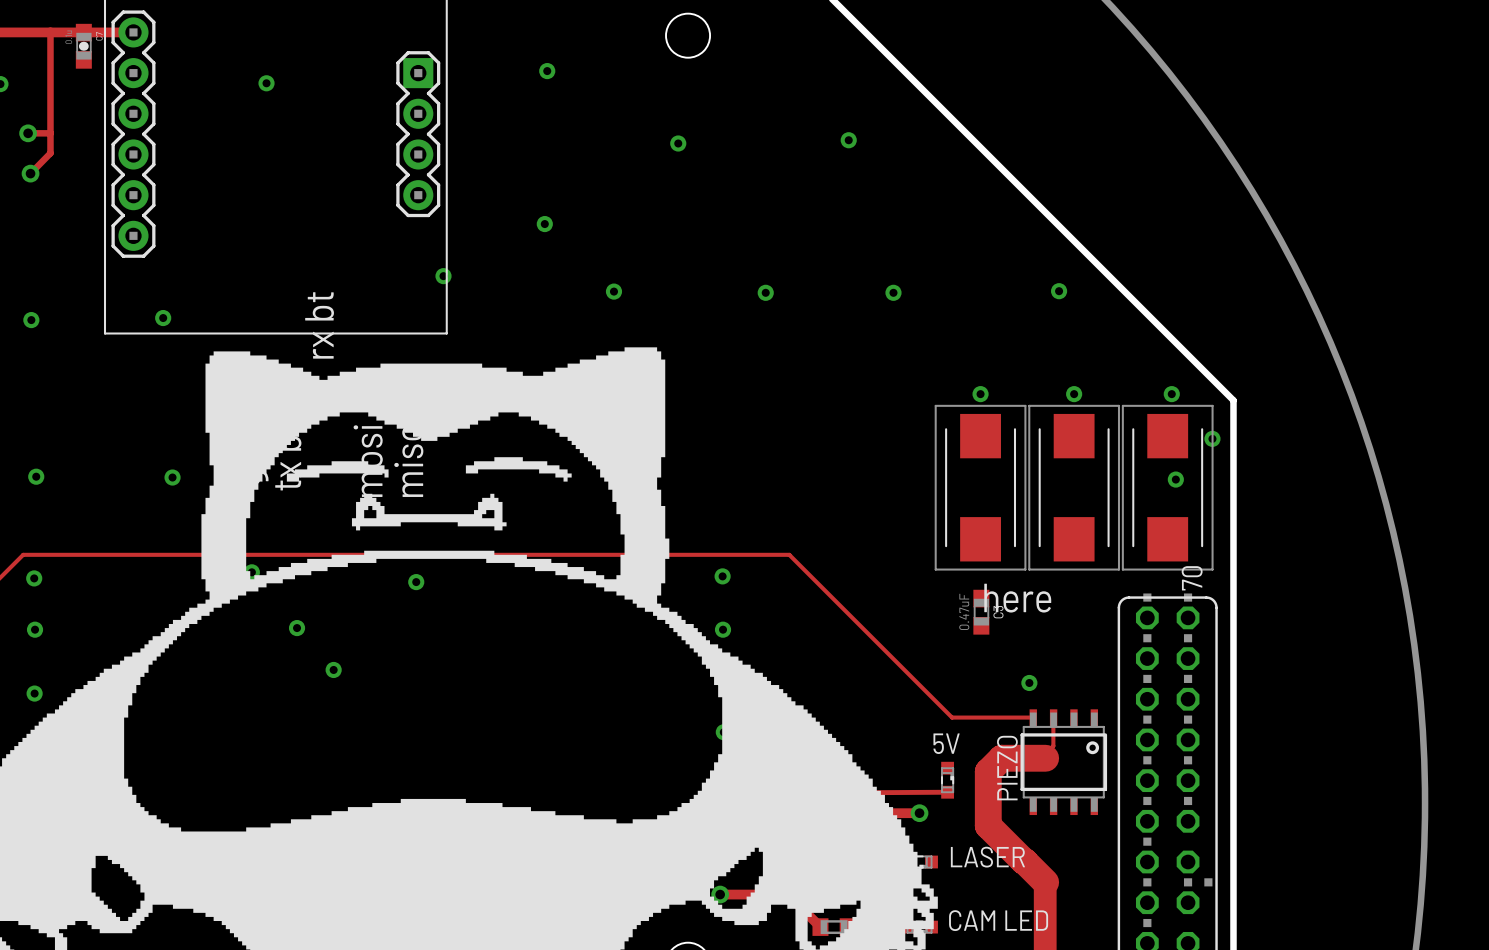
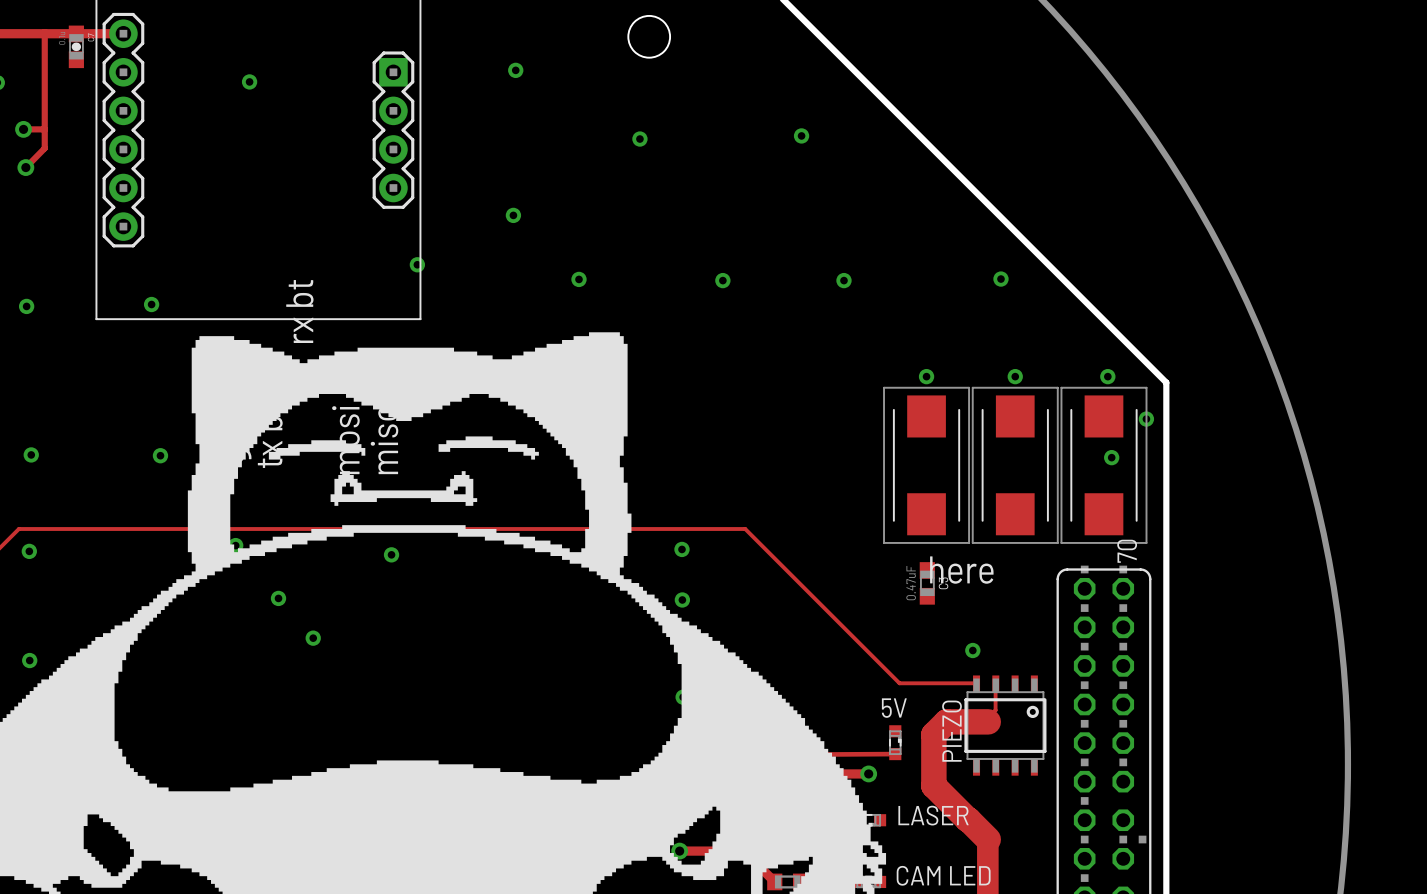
via: (35, 629) -> none

